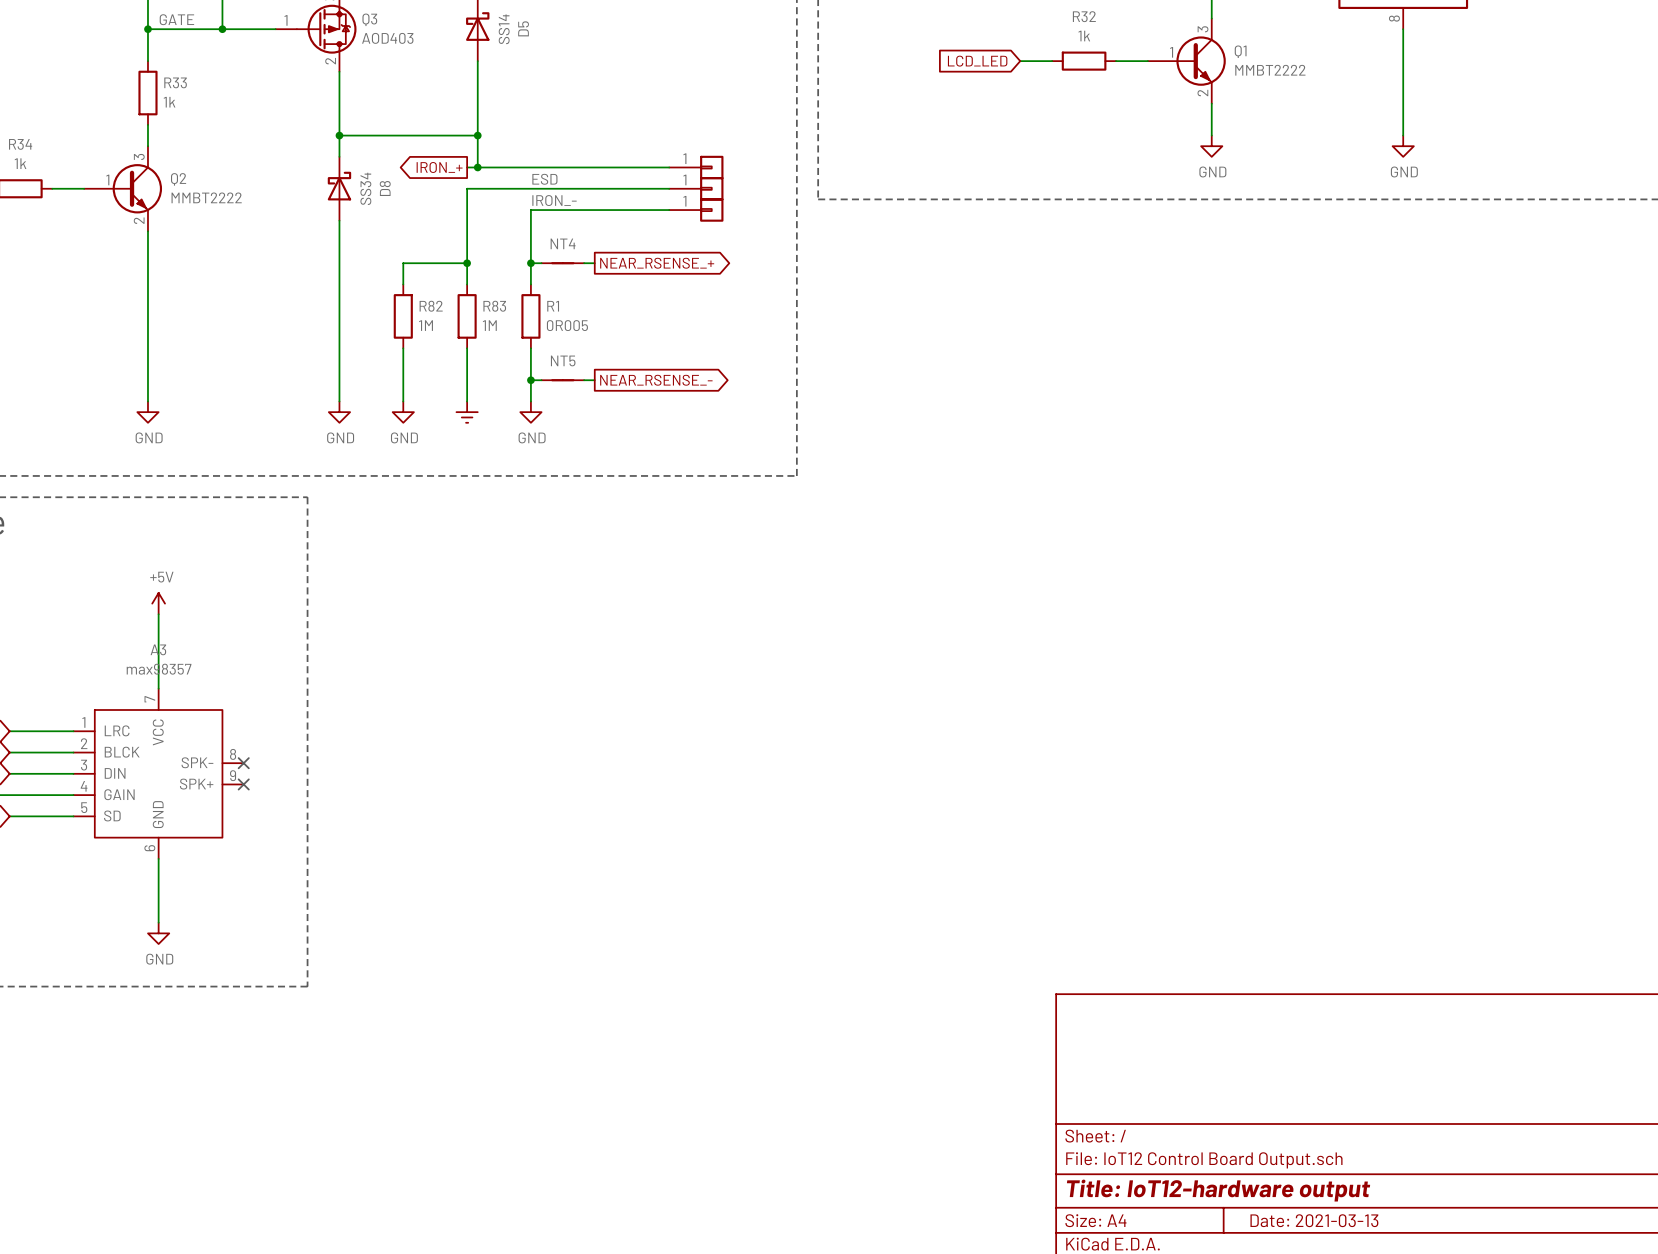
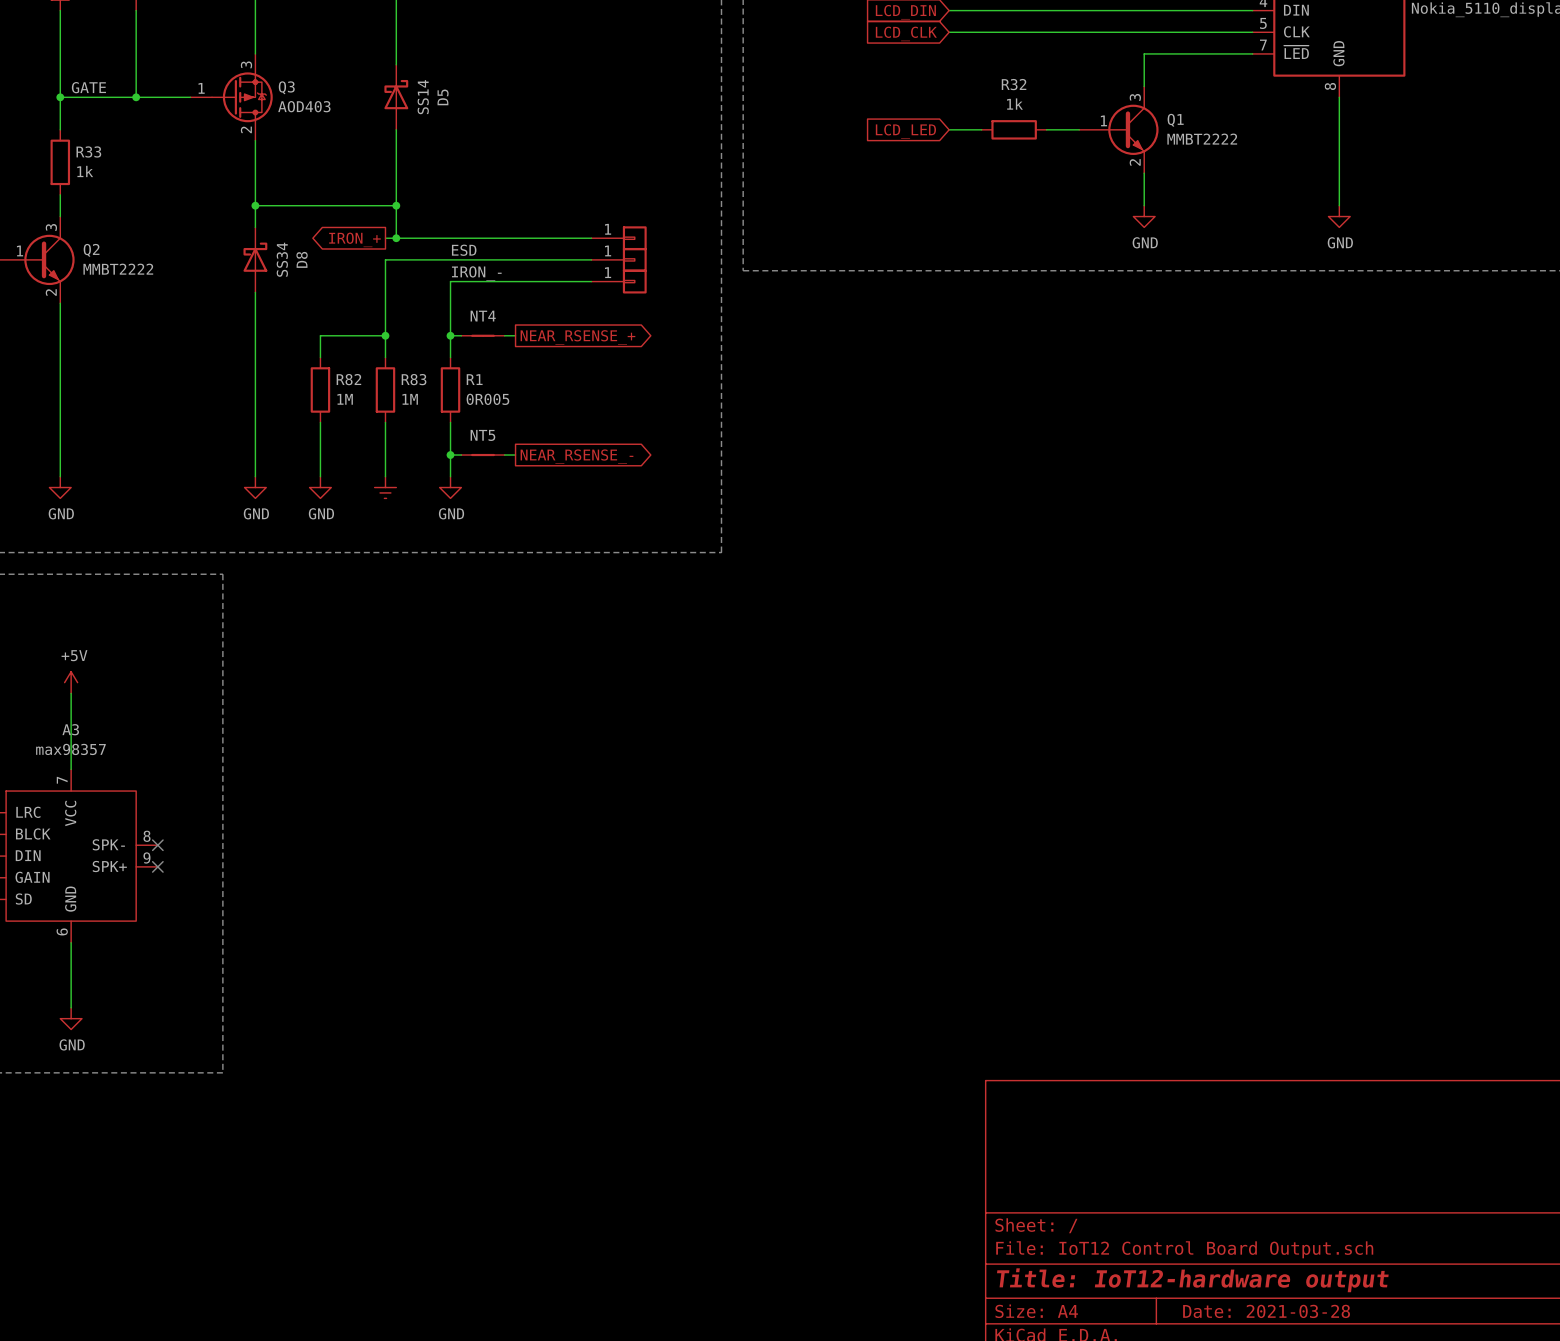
title block: Date: 2021-03-13 (1314, 1220) -> Date: 2021-03-28 (1266, 1311)

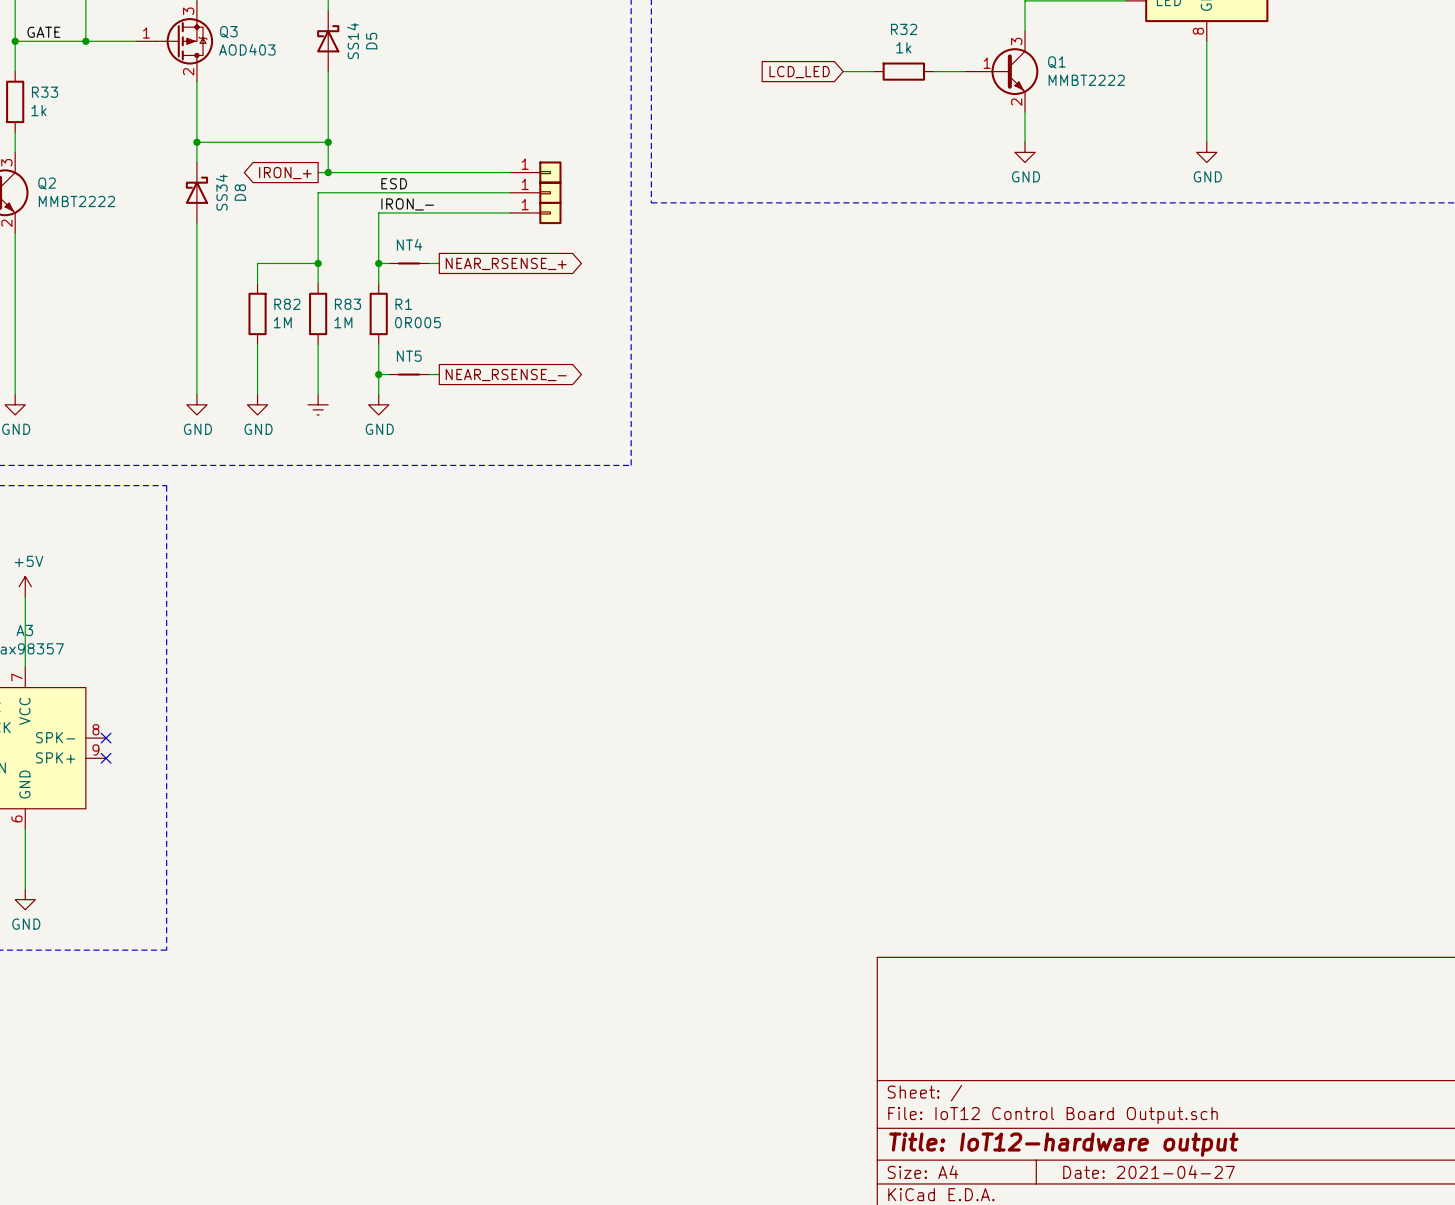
title block: Date: 2021-03-28 (1266, 1311) -> Date: 2021-04-27 (1149, 1172)

